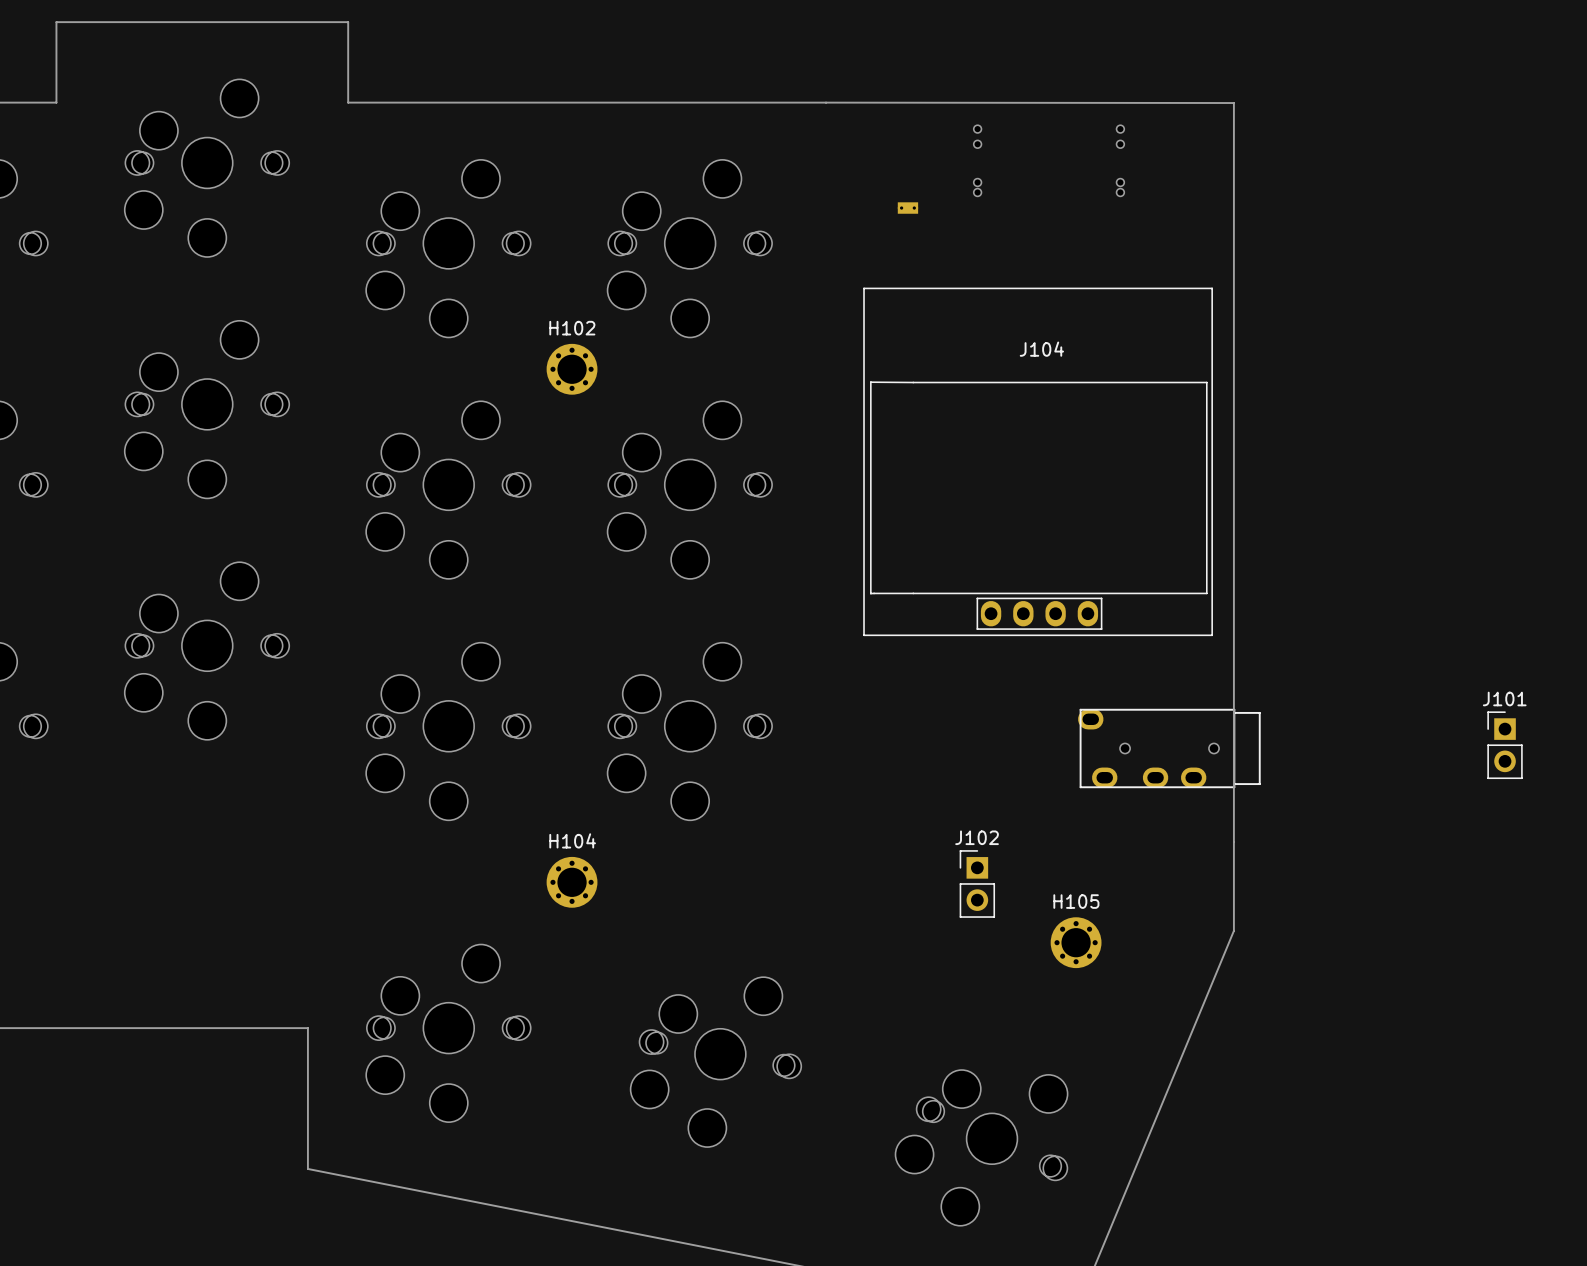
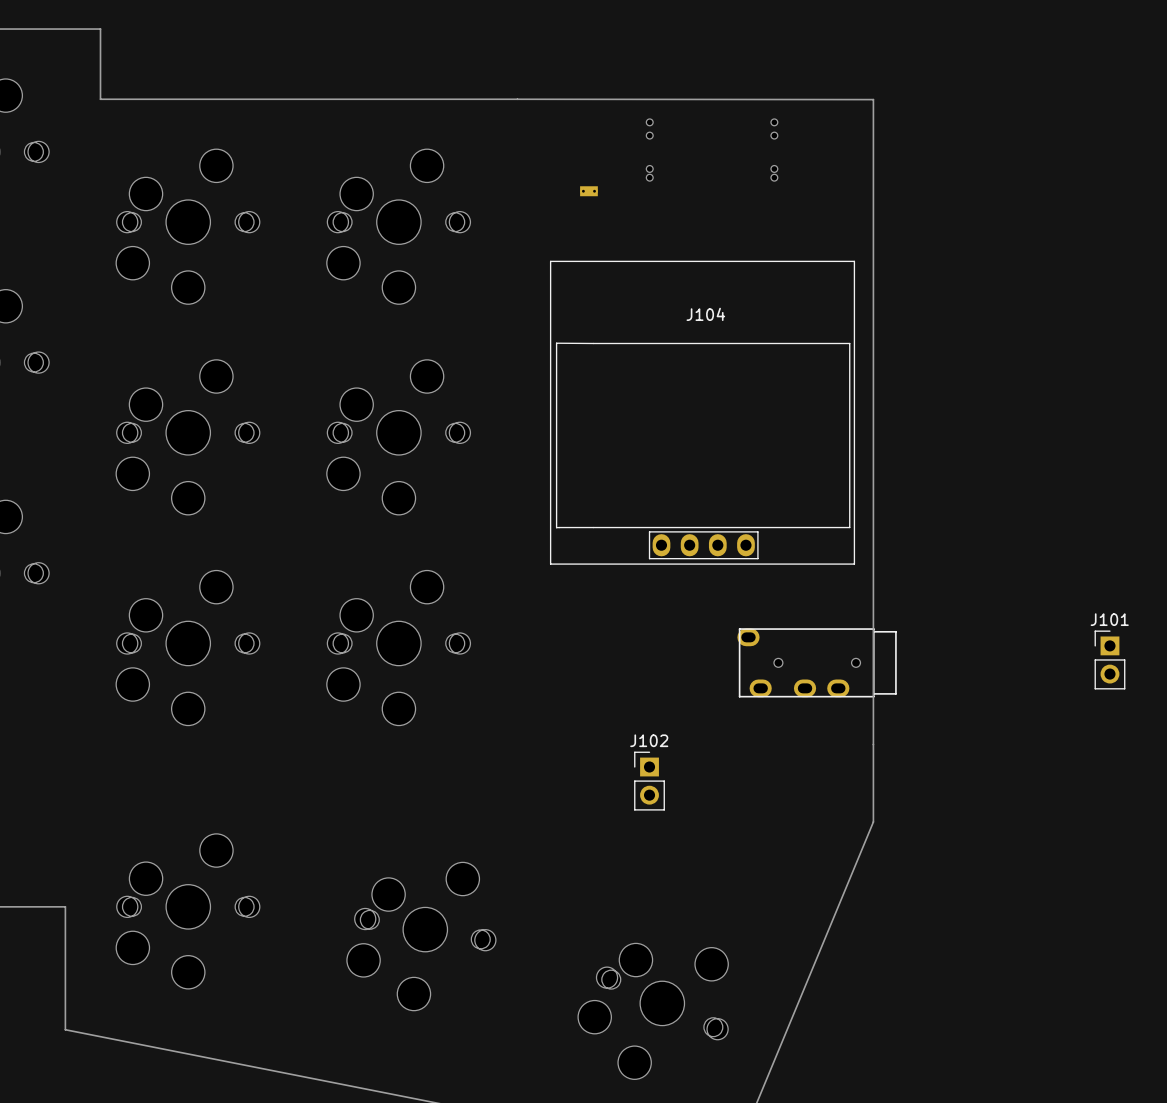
H102: (572, 369) -> none
H104: (572, 882) -> none
H105: (1076, 942) -> none

